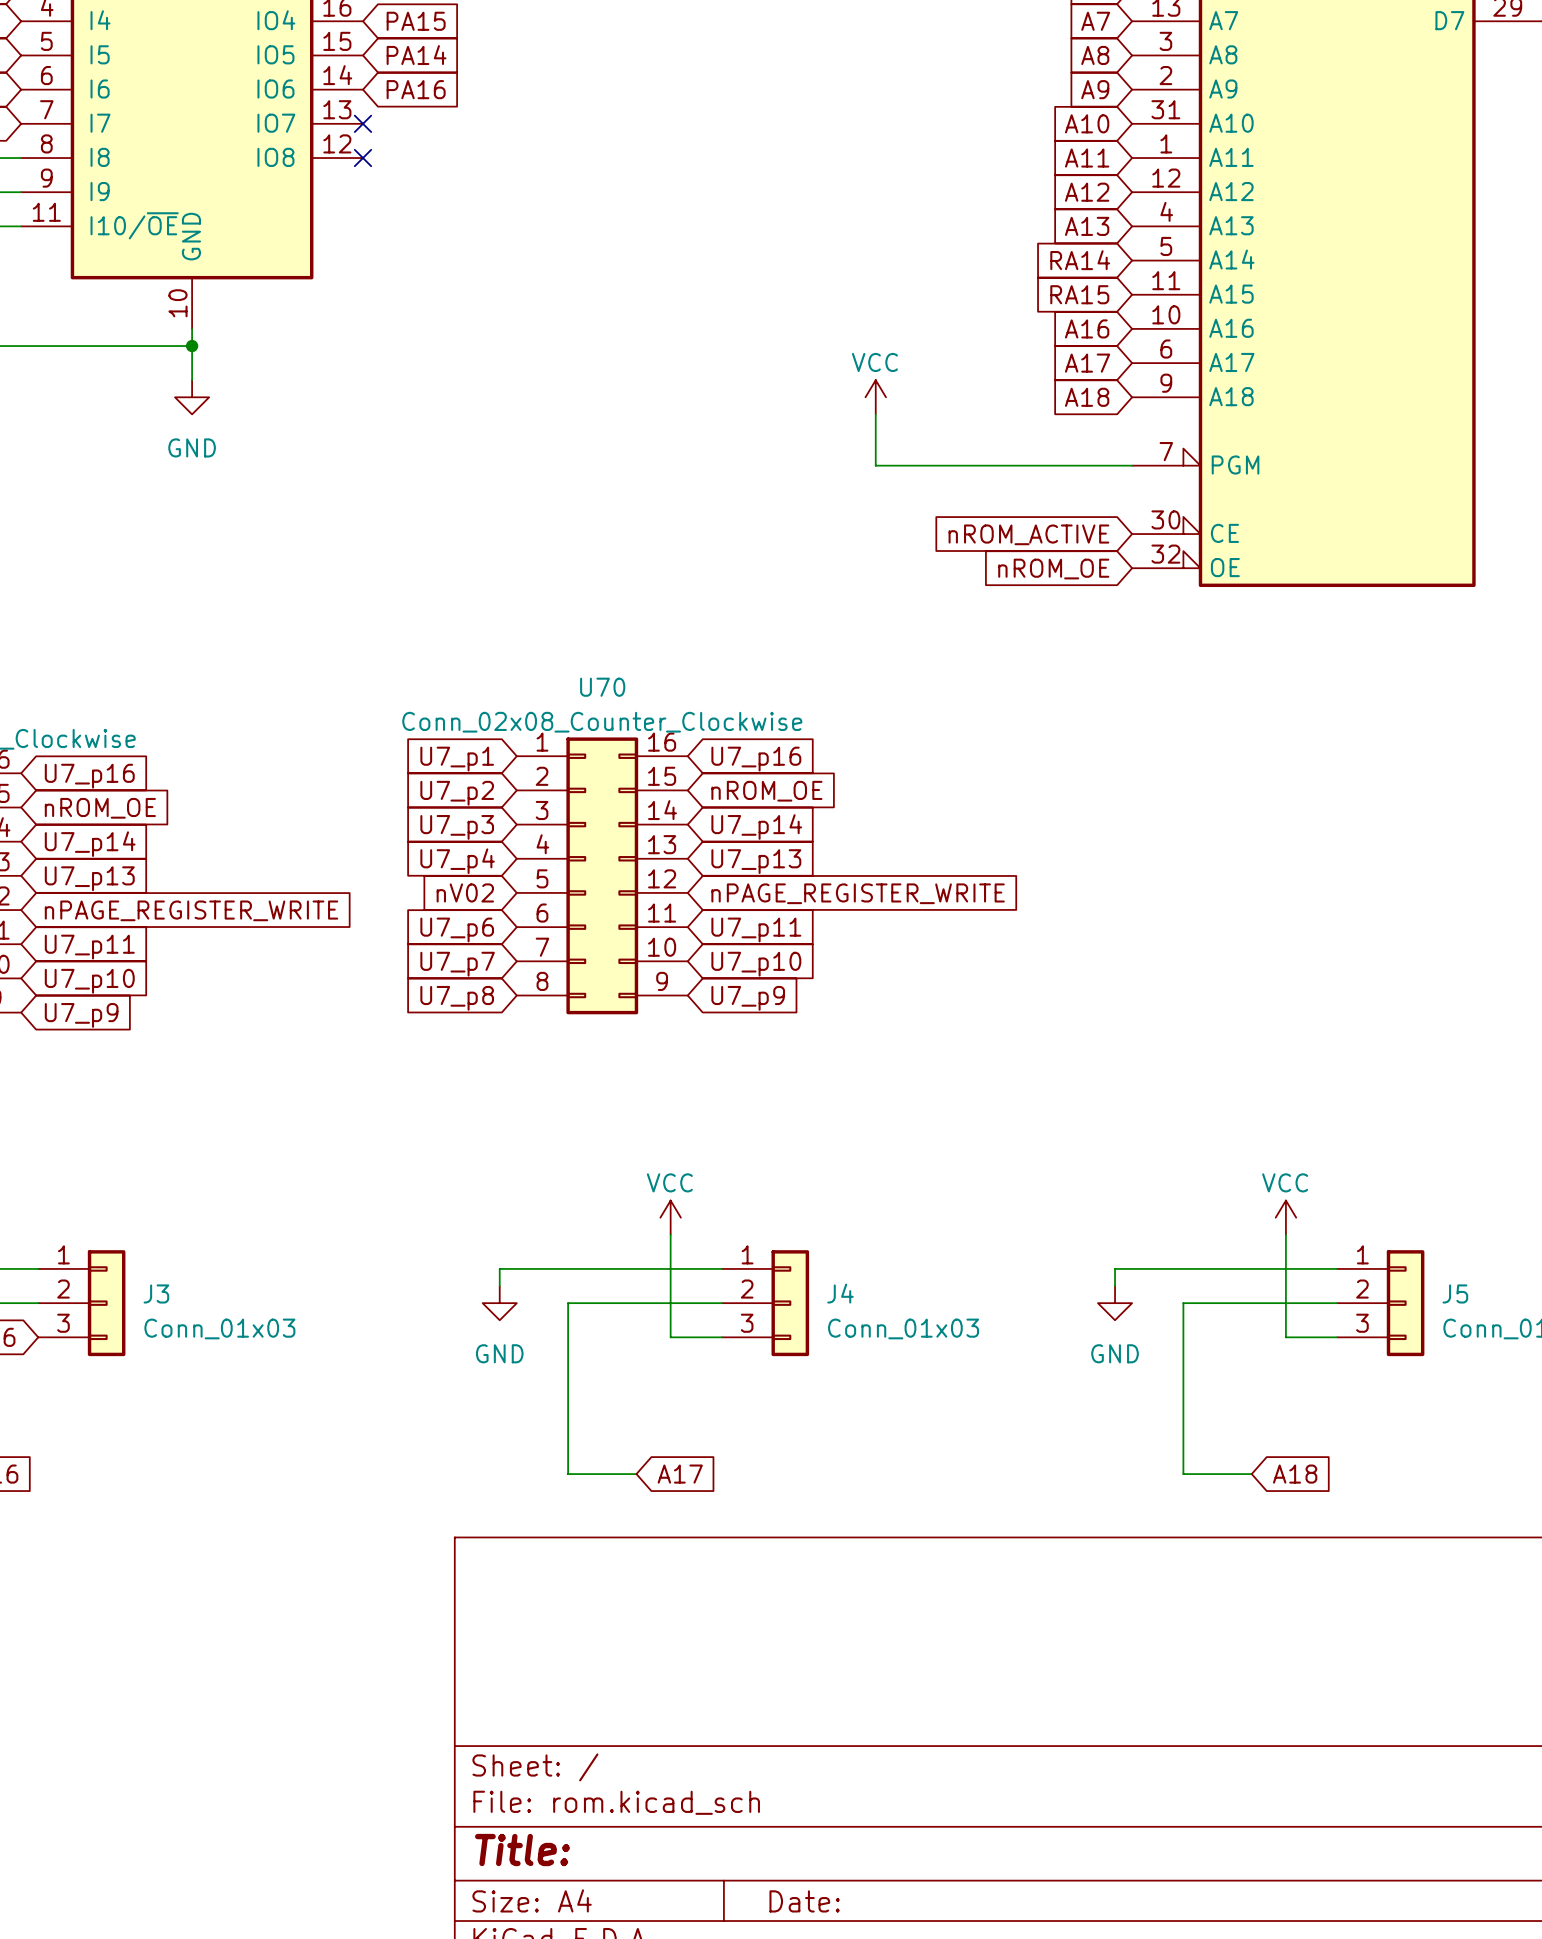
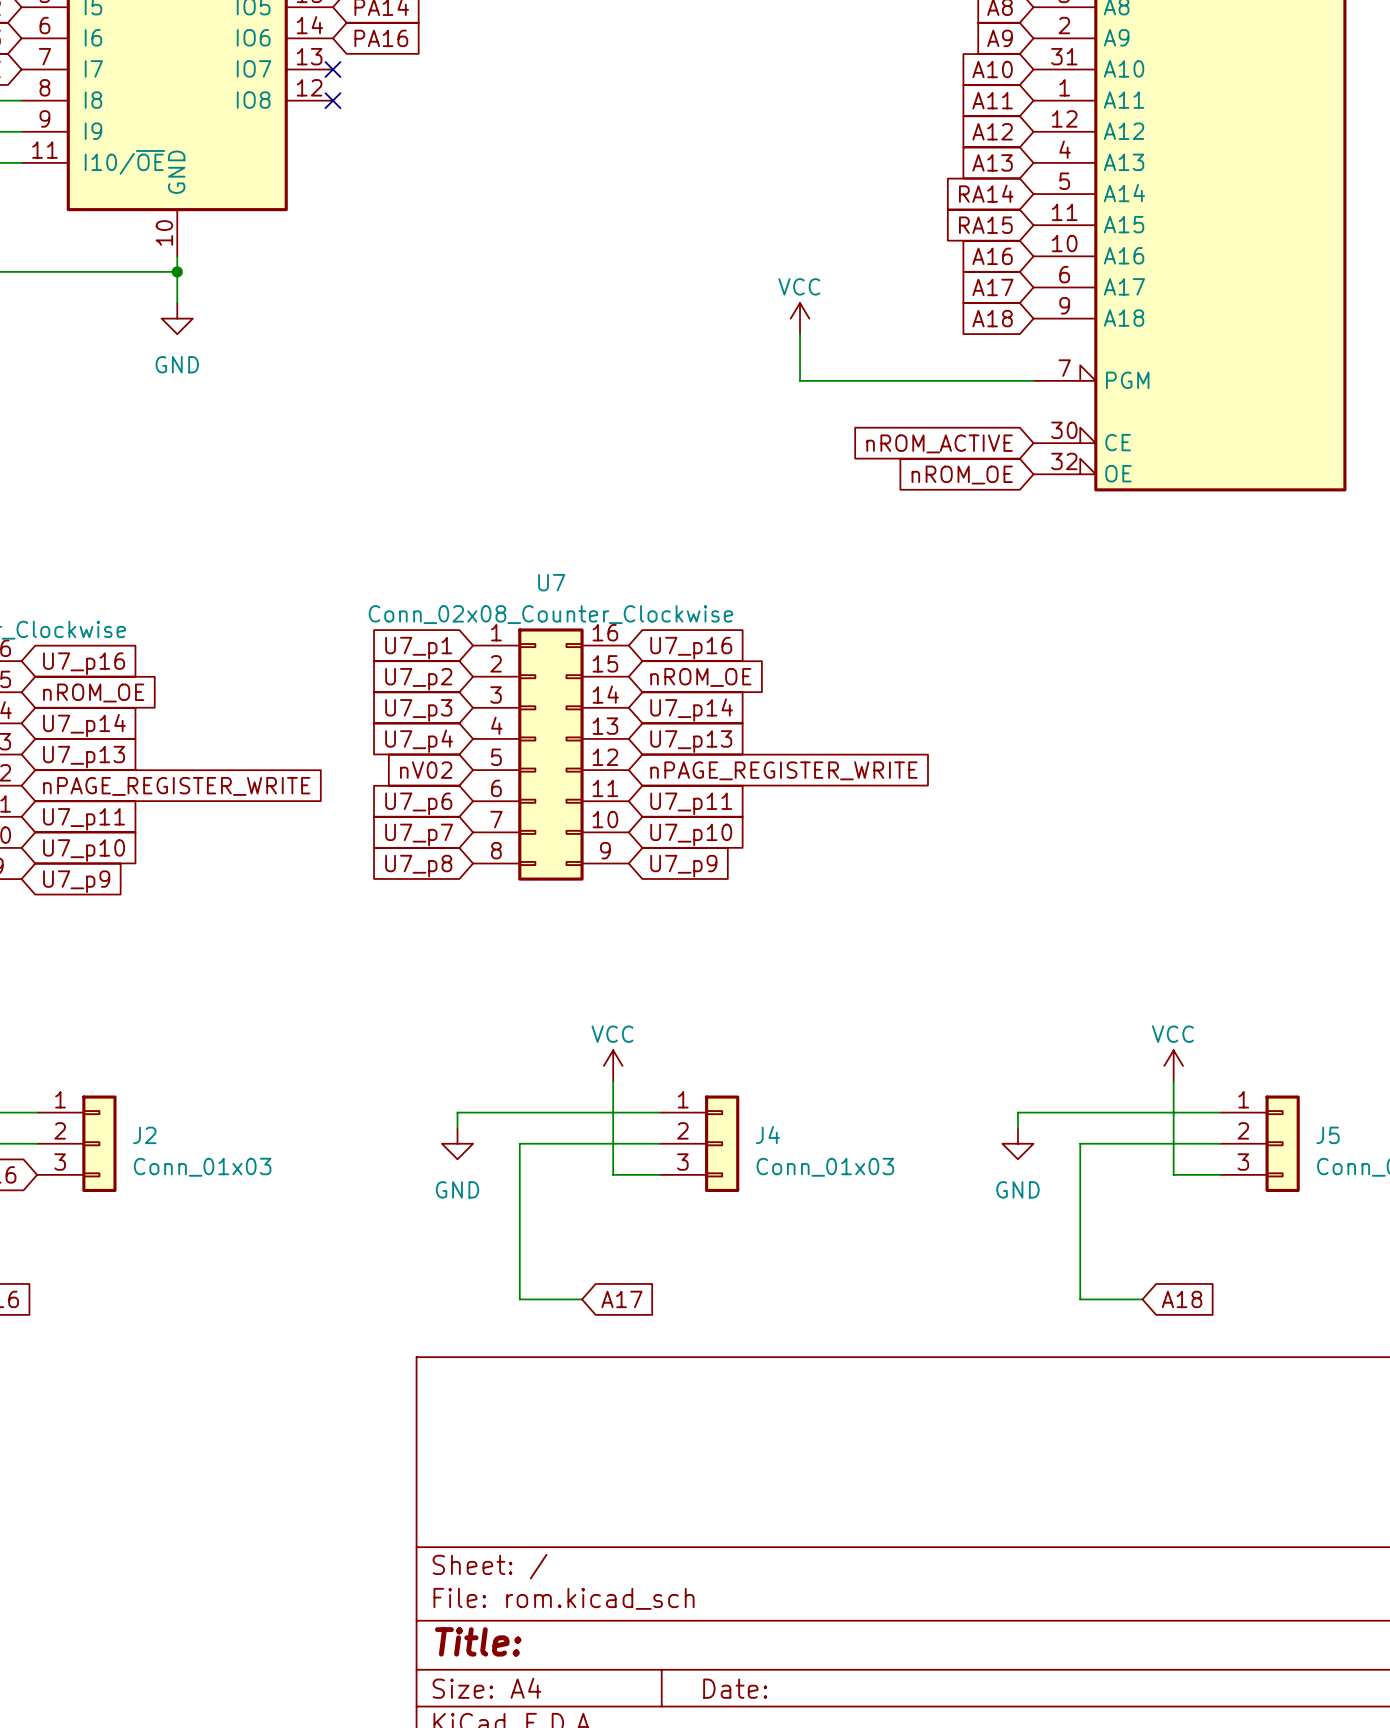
U70 name: U70 (602, 687) -> U7 (551, 582)
J3 name: J3 (156, 1293) -> J2 (144, 1135)

